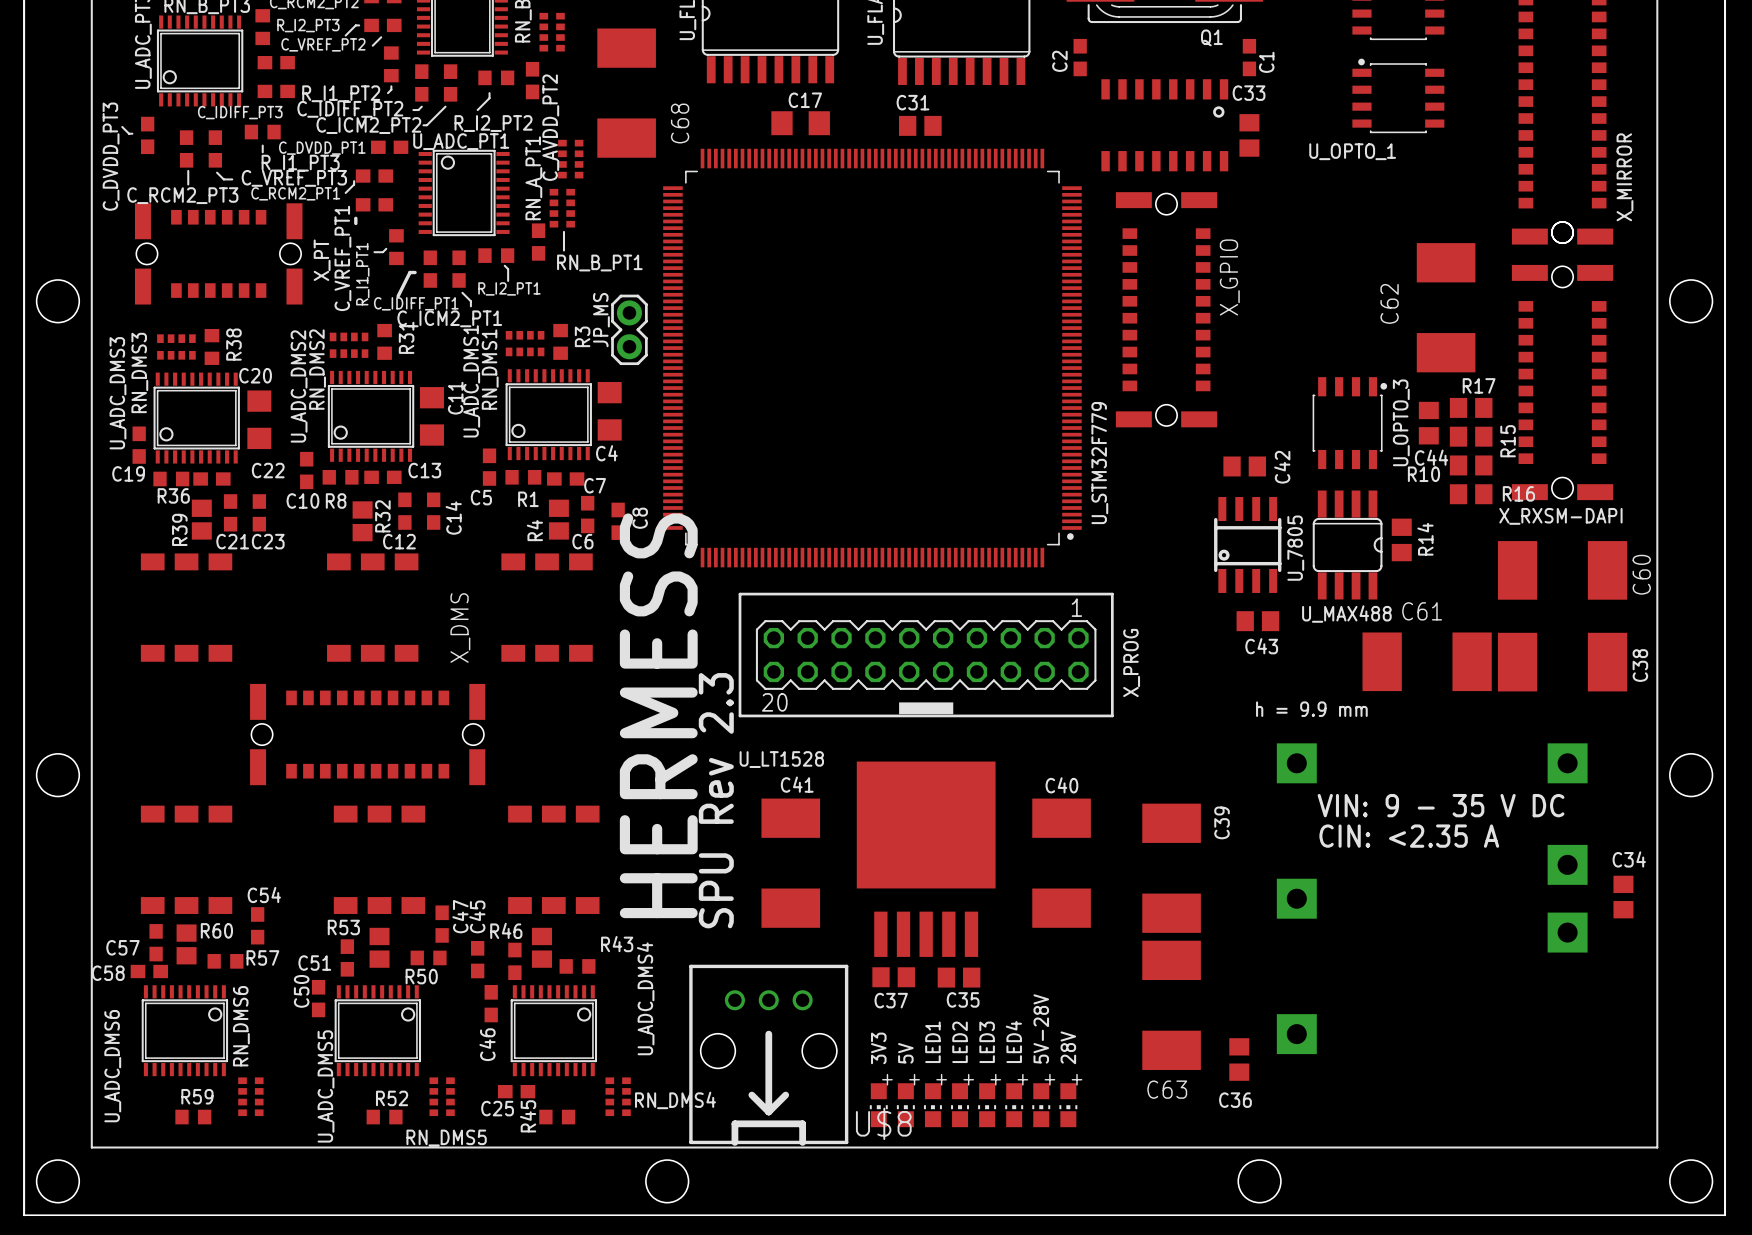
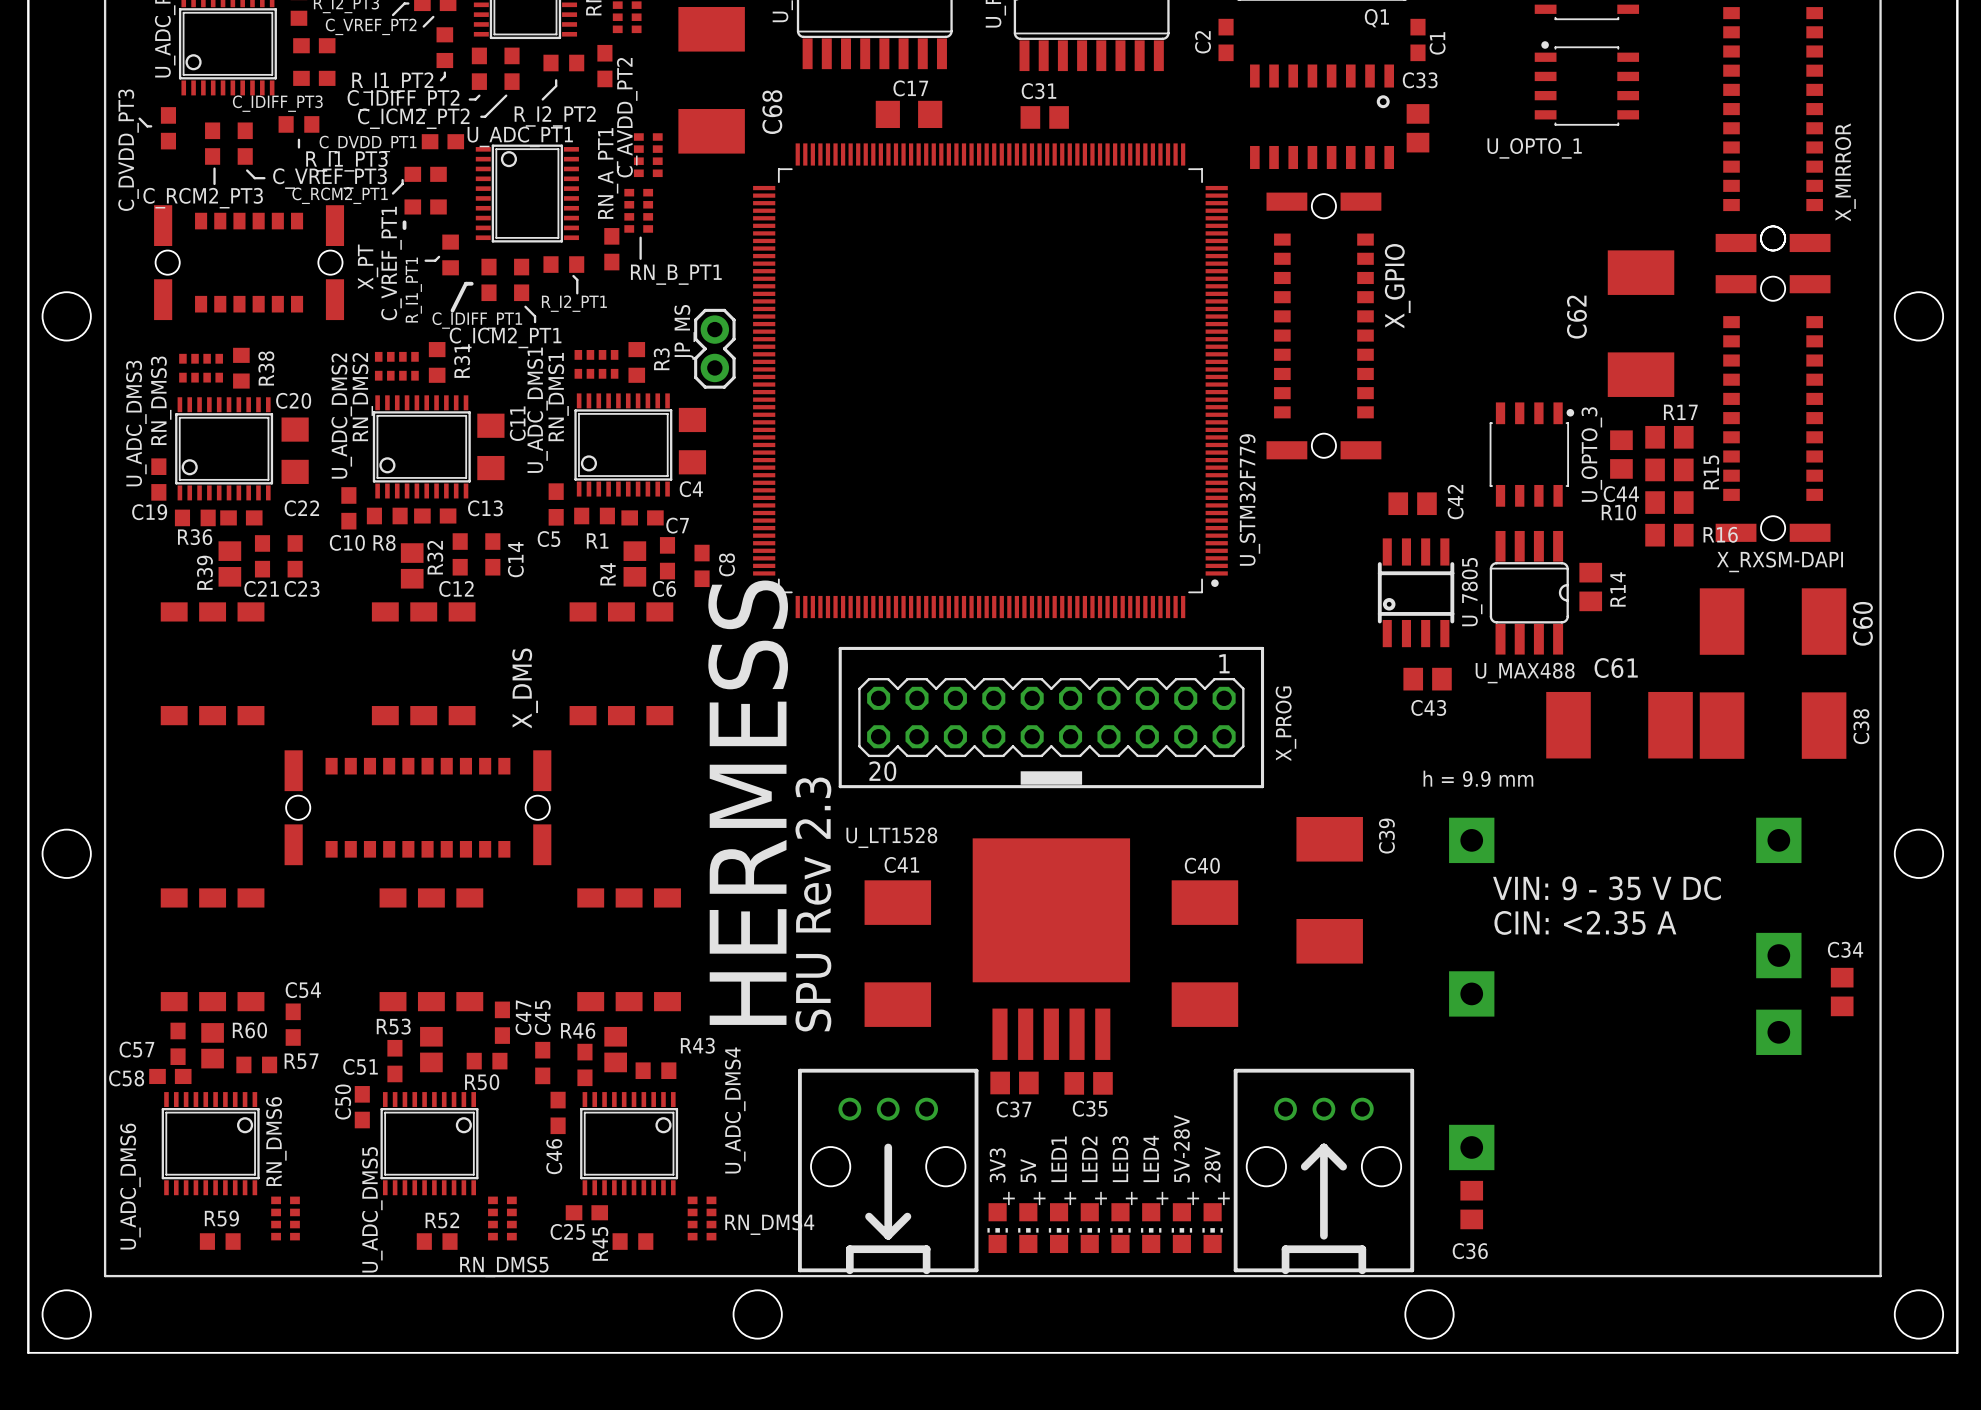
C39 position: (1171, 868) -> (1329, 890)
C63: (1171, 1005) -> none
U$8: (768, 1055) -> none
part: none -> (888, 1171)
part: none -> (1323, 1171)
C36 position: (1239, 1059) -> (1471, 1205)

